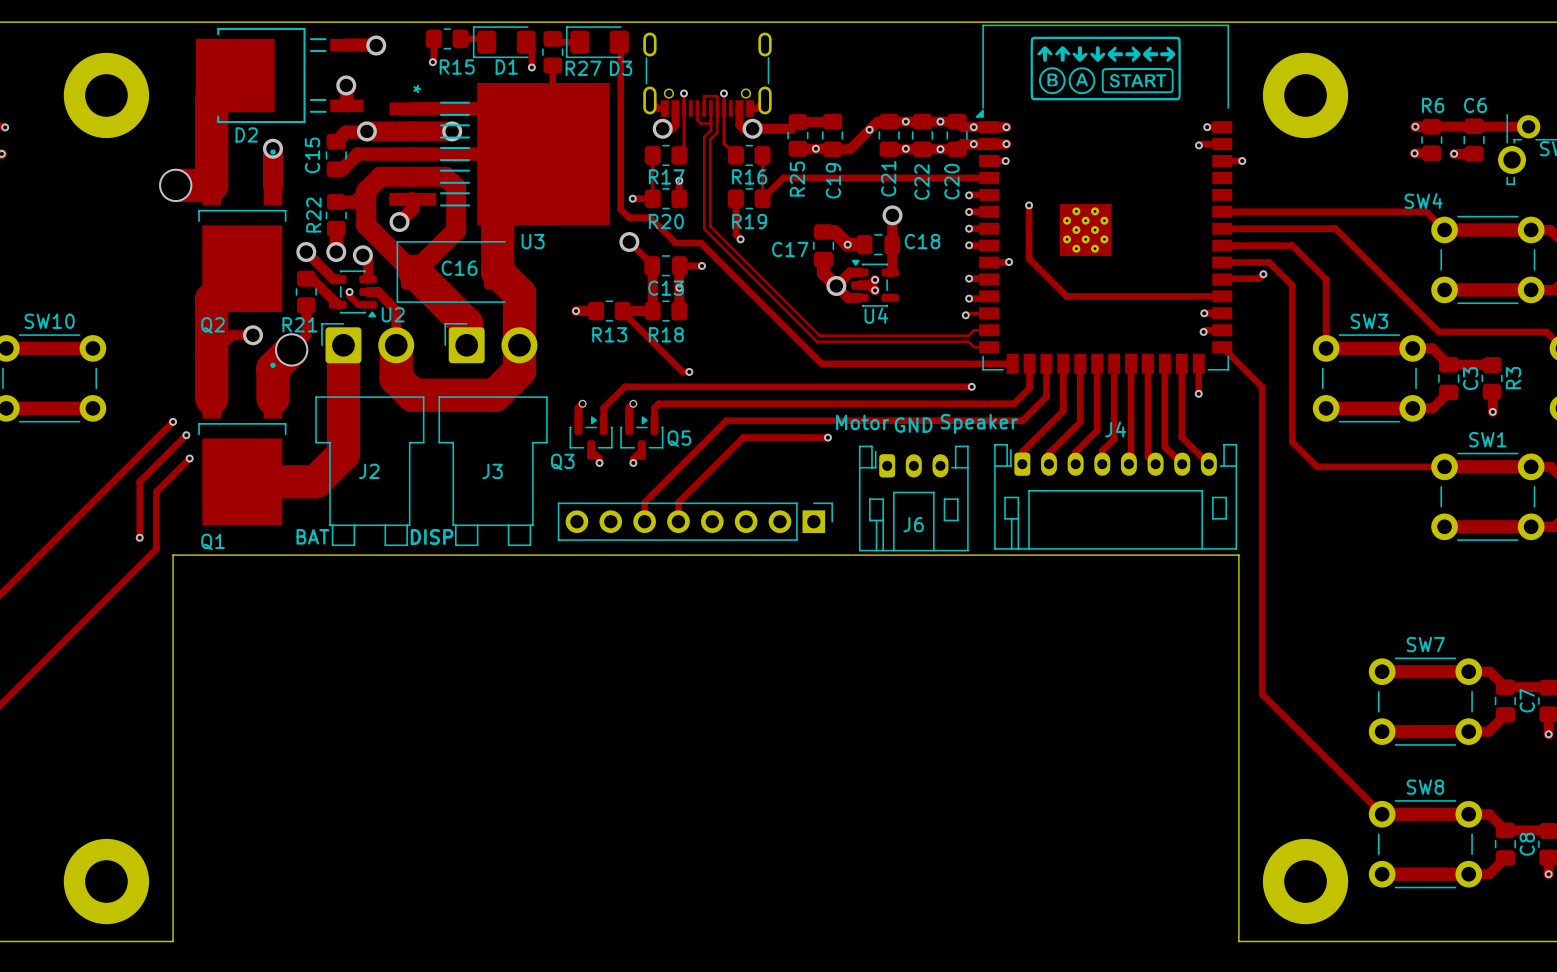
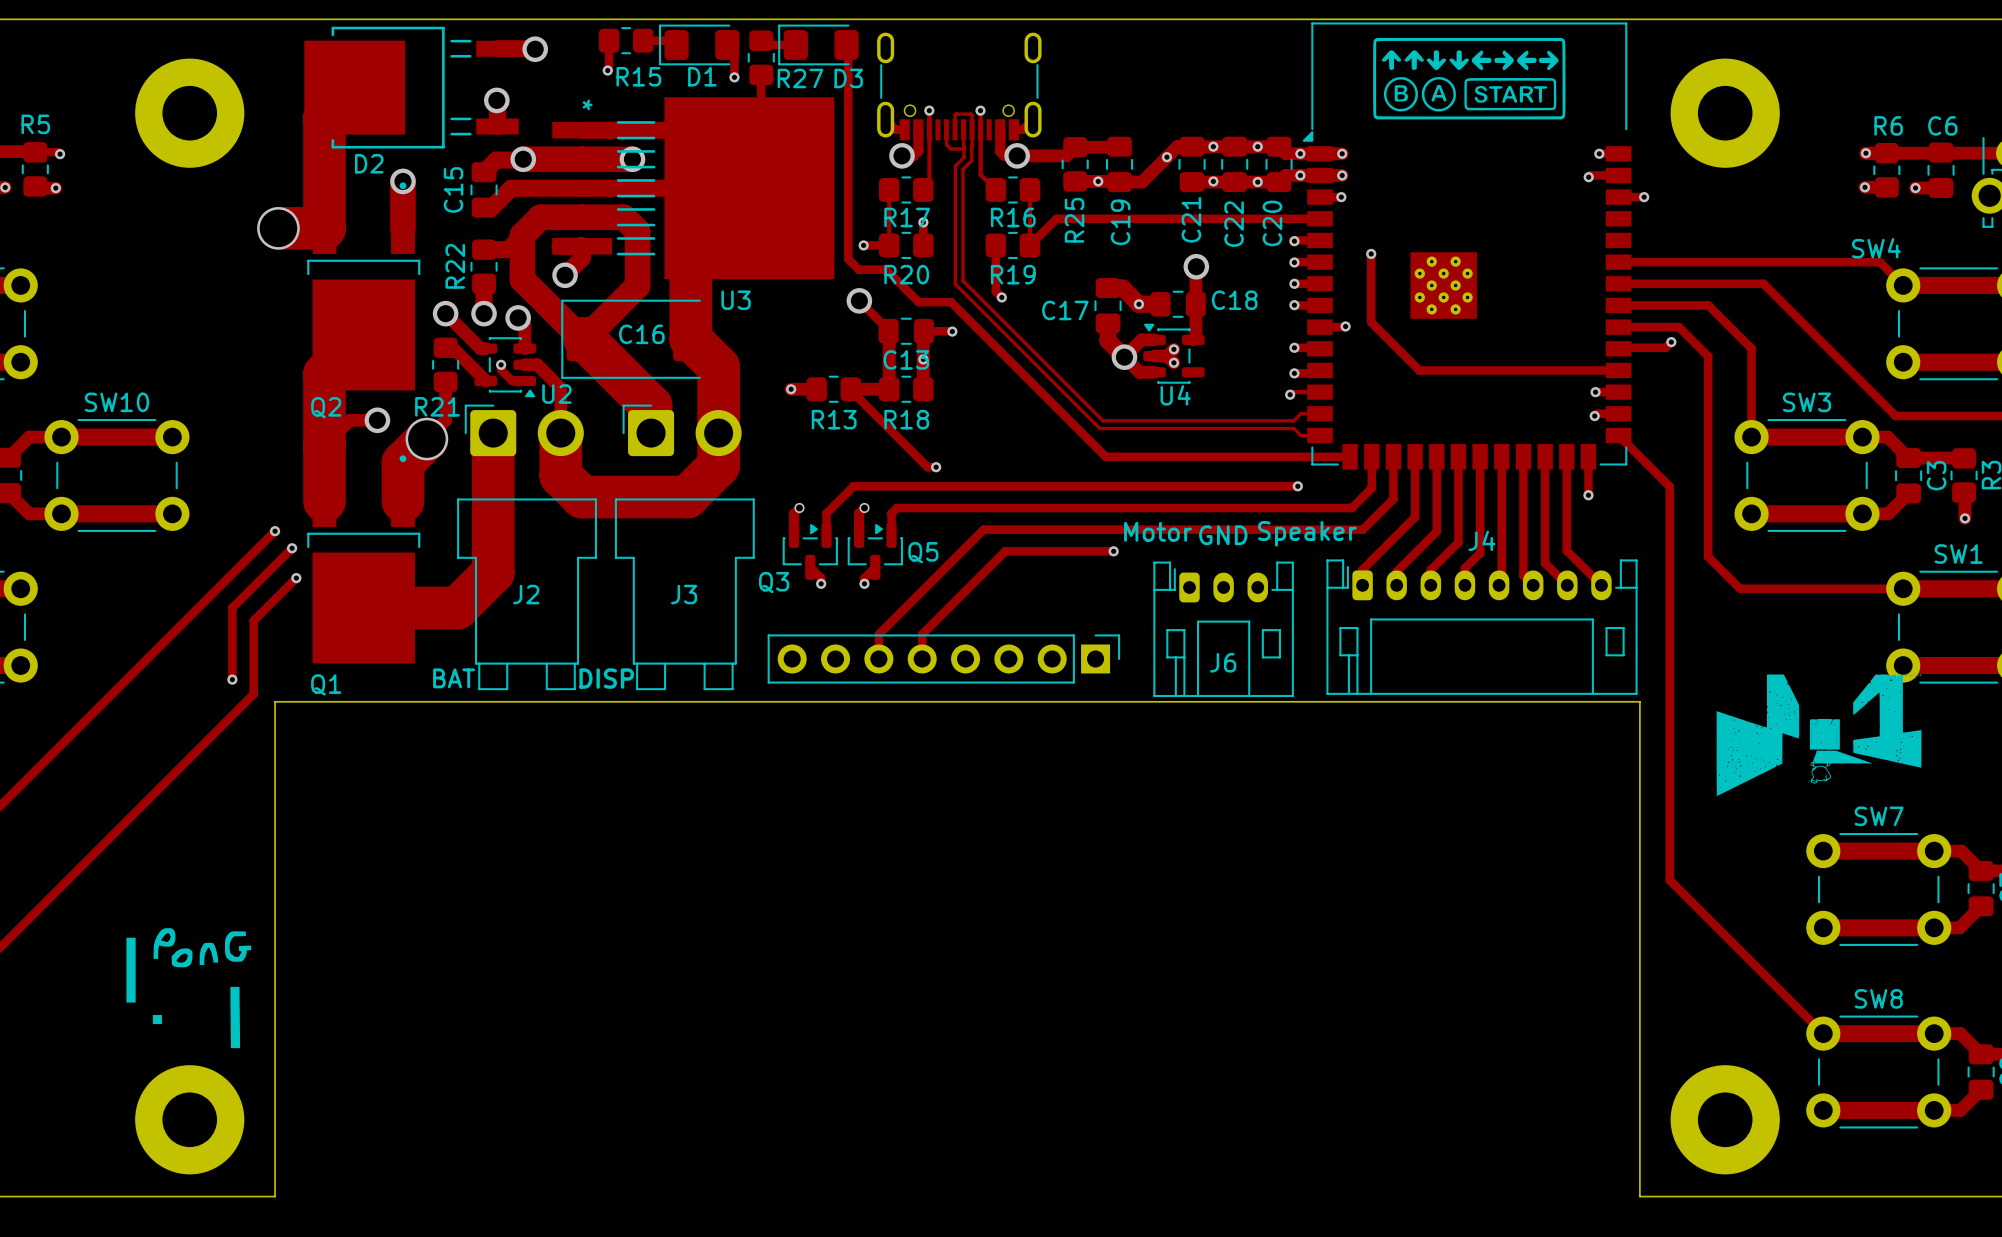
drawing: none -> [1716, 674, 1922, 797]
drawing: none -> [126, 928, 252, 1049]

